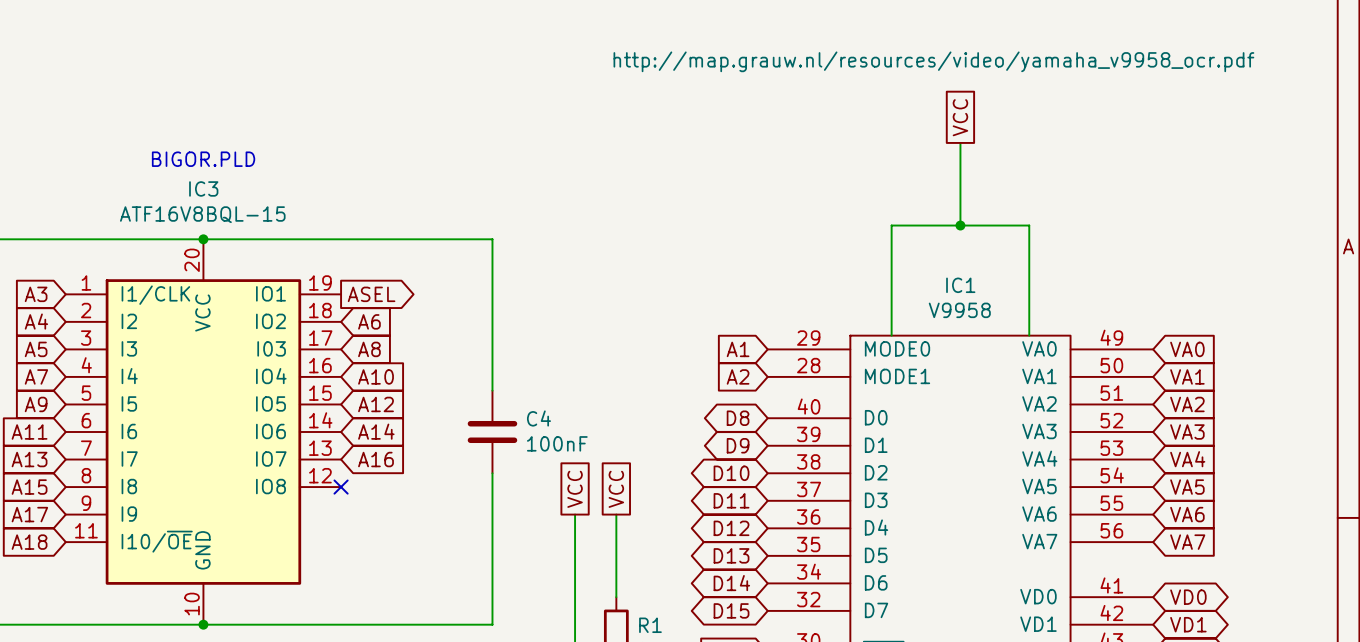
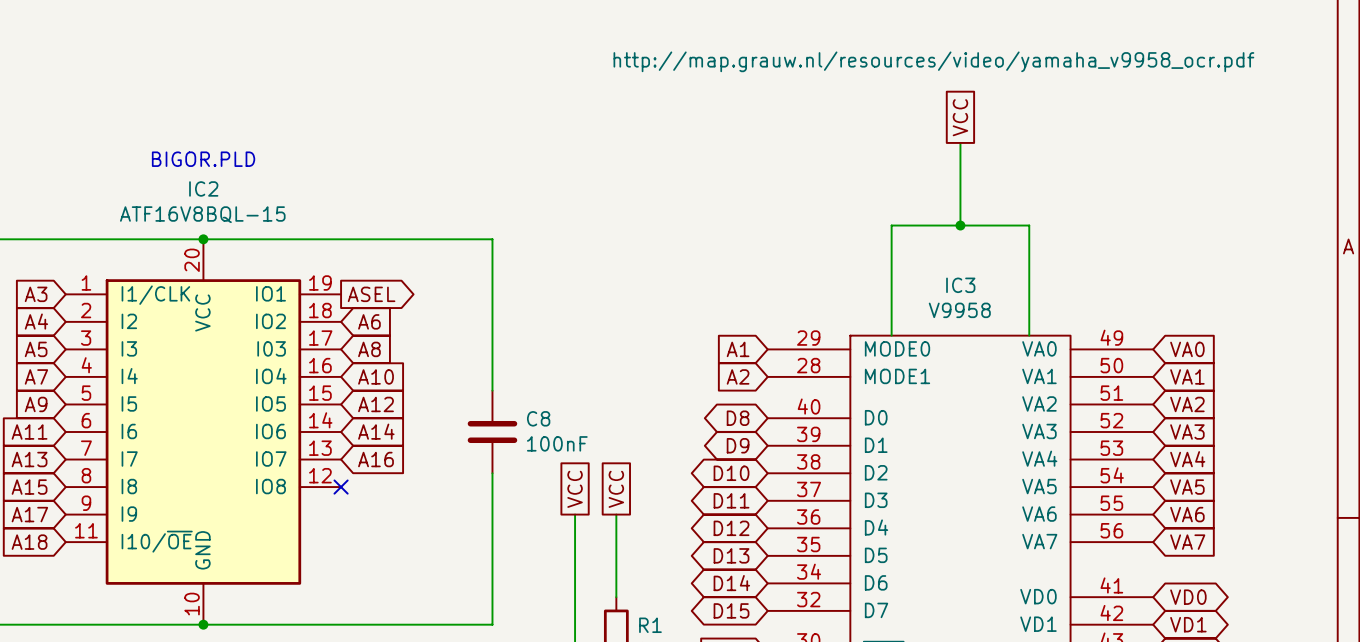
IC3 name: IC3 (203, 188) -> IC2 (203, 188)
IC1 name: IC1 (960, 285) -> IC3 (960, 285)
C4 name: C4 (538, 418) -> C8 (538, 418)

